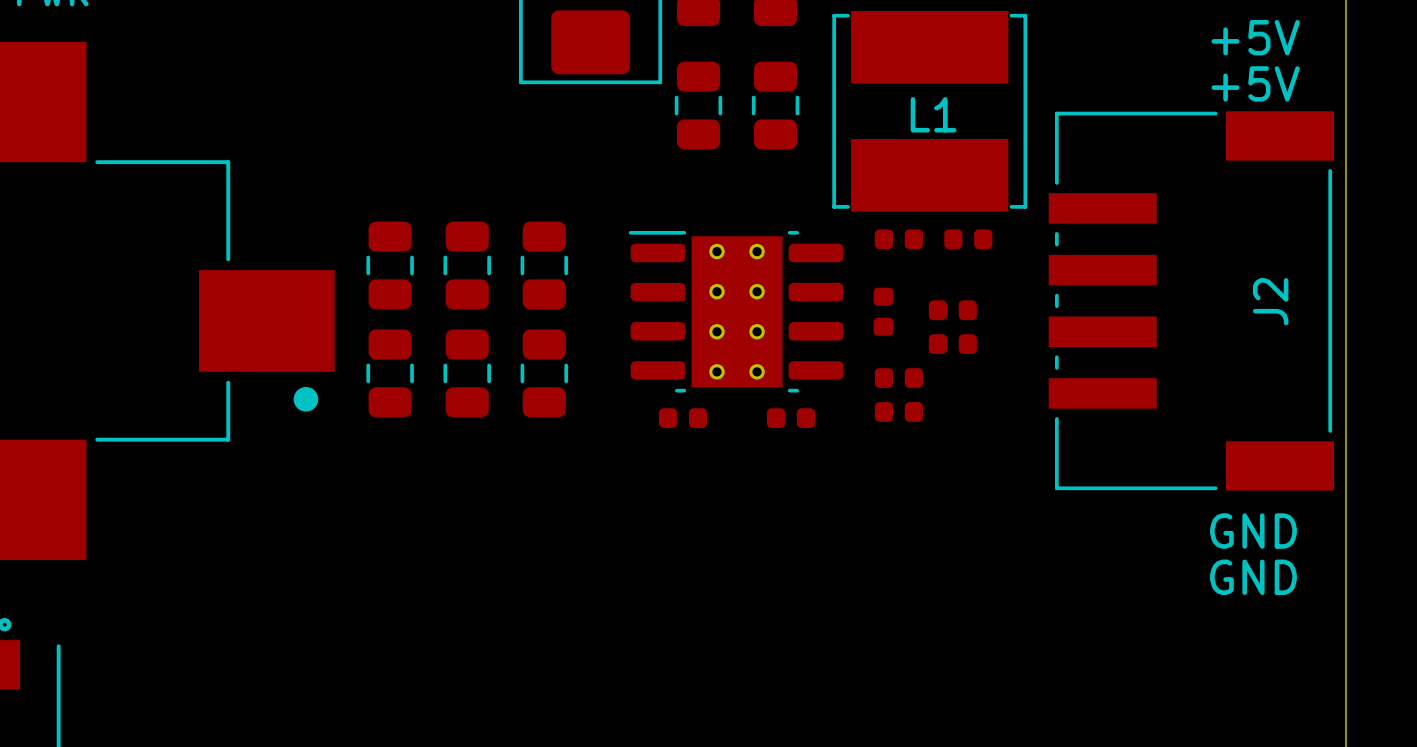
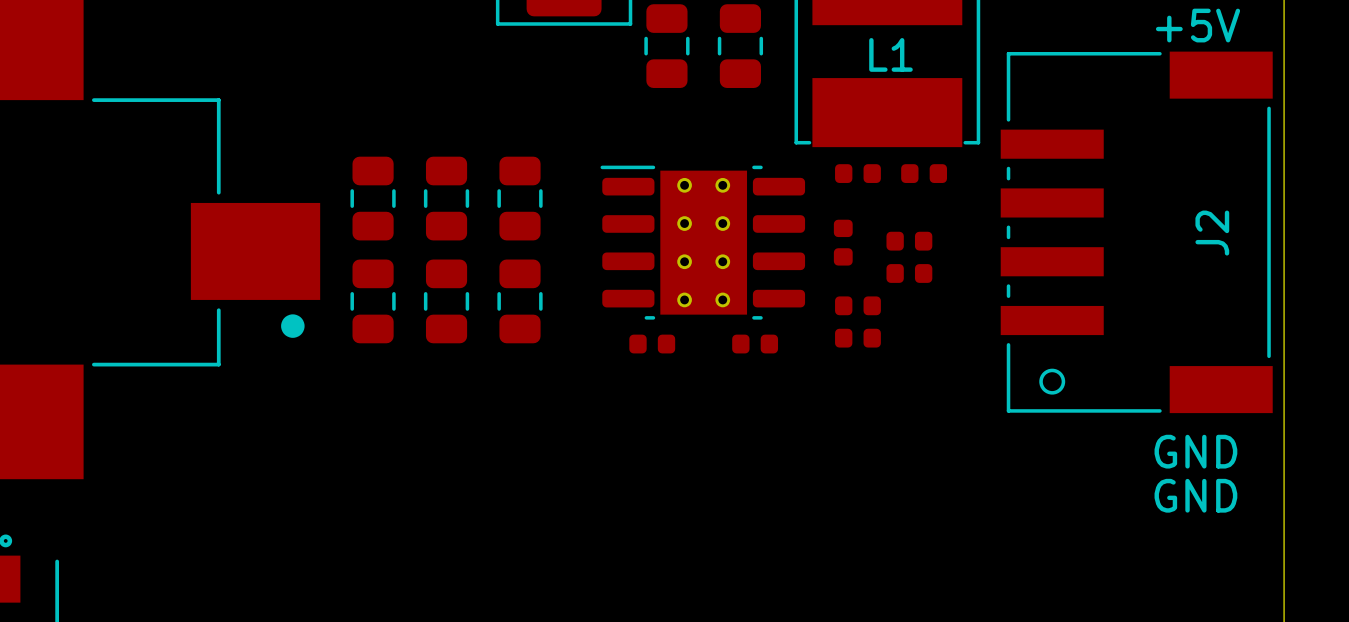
J2 footprint: [1048, 111, 1335, 491] -> [1000, 51, 1273, 414]

